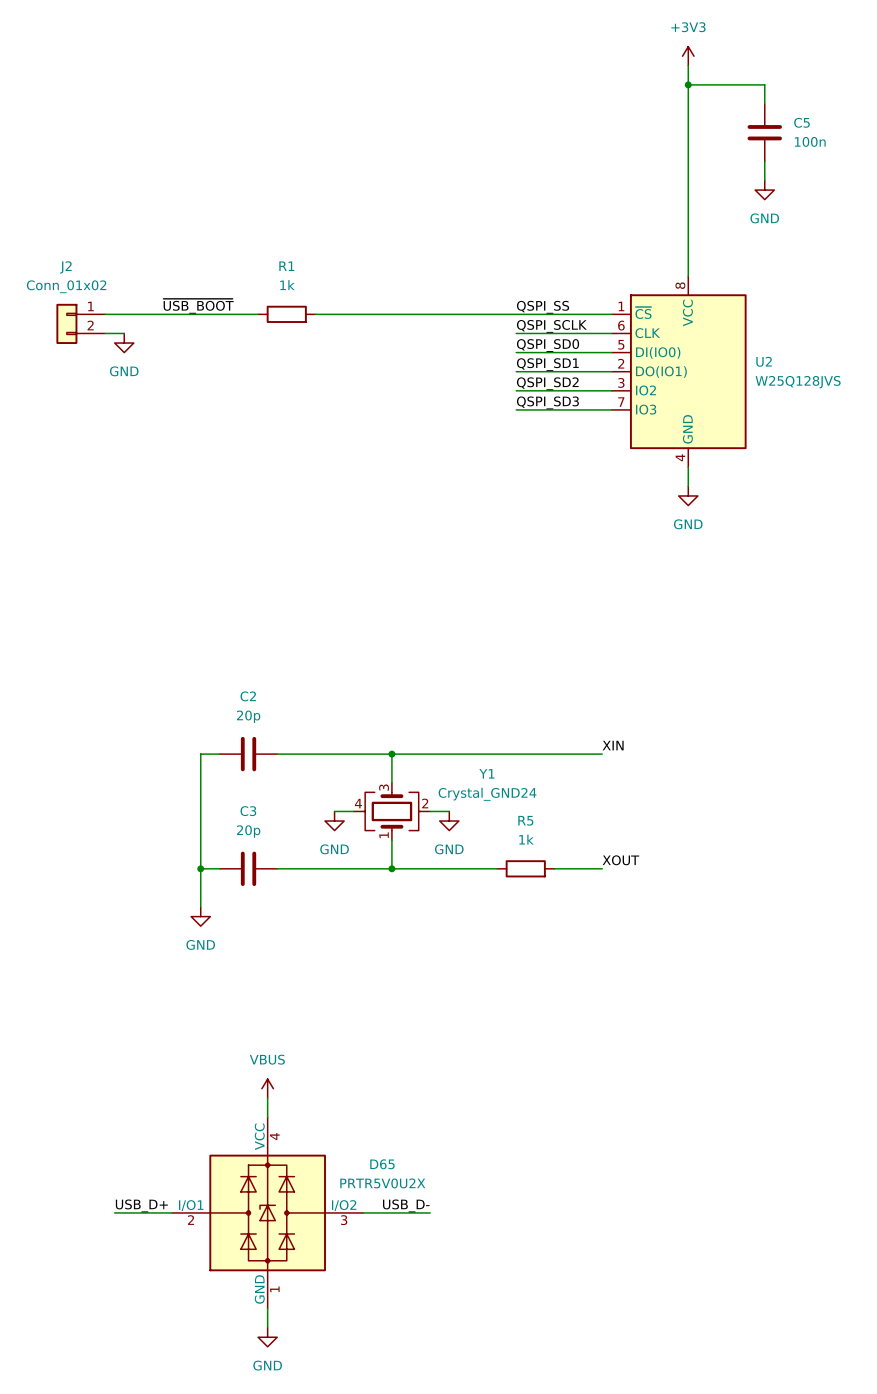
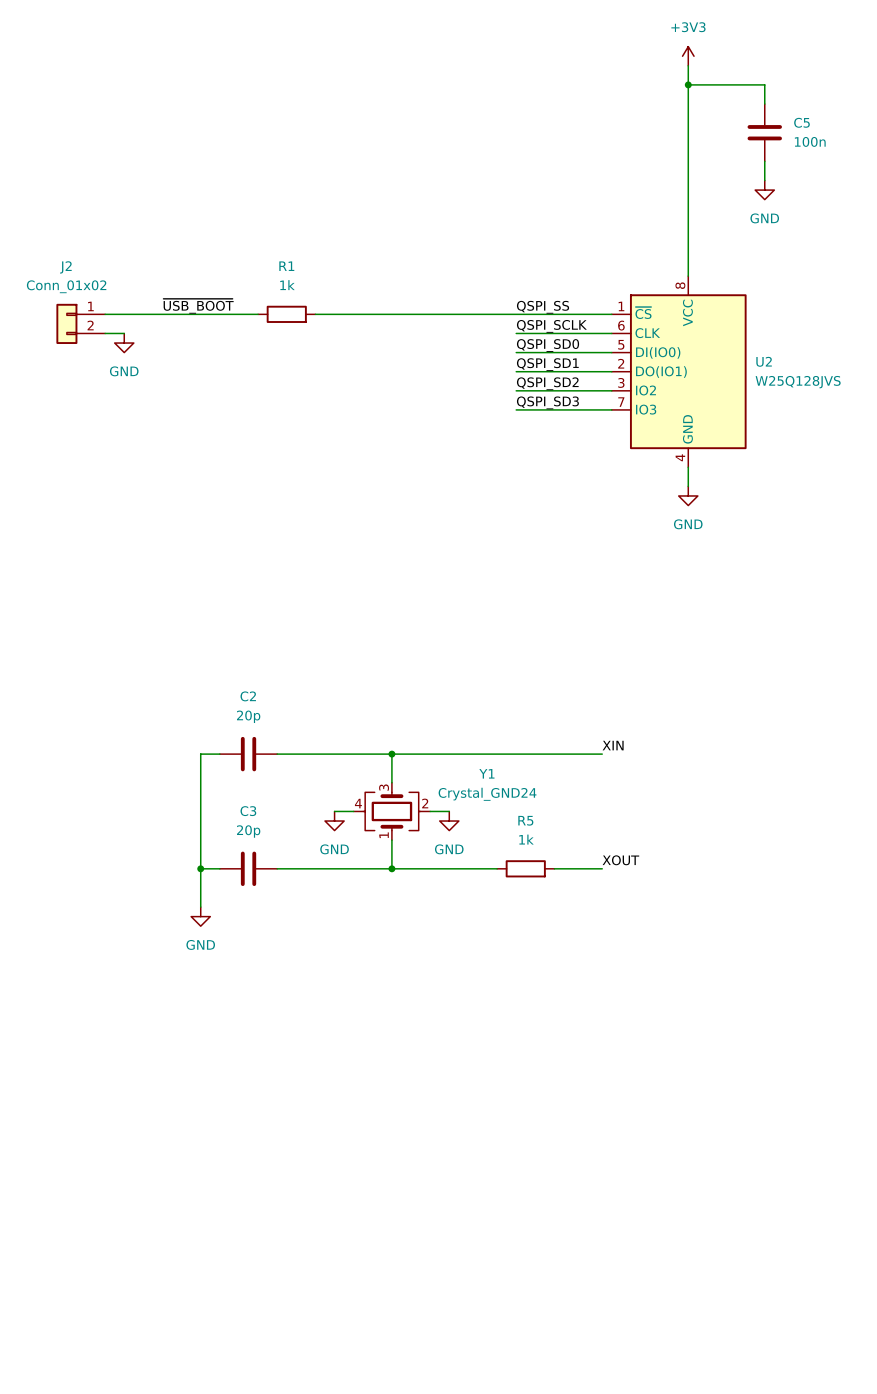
power symbol: VBUS (267, 1088) -> none
wire: (267, 1098) (267, 1117) -> none
label: USB_D+ (141, 1205) -> none
label: USB_D- (406, 1205) -> none
wire: (114, 1212) (172, 1212) -> none
D65: PRTR5V0U2X (267, 1212) -> none
wire: (363, 1212) (430, 1212) -> none
wire: (267, 1308) (267, 1327) -> none
power symbol: GND (267, 1337) -> none

